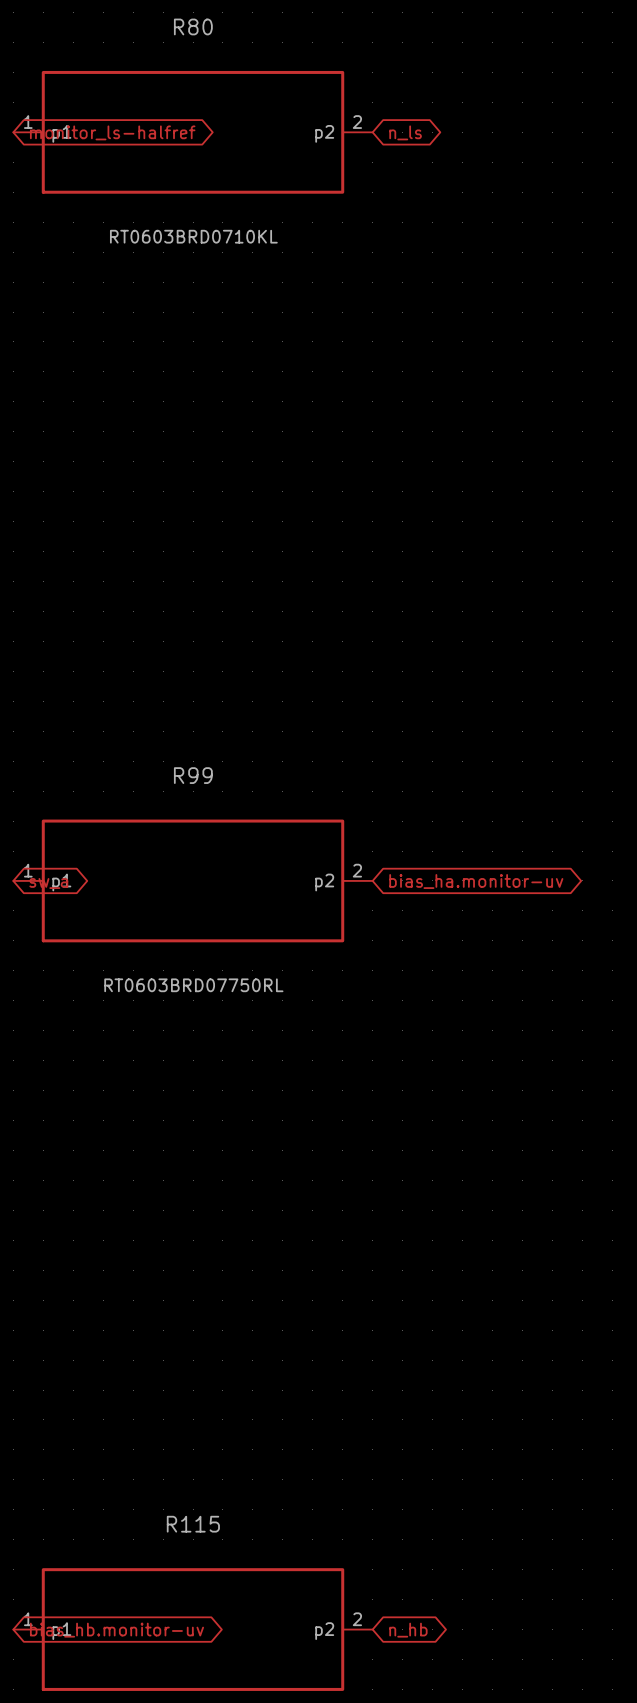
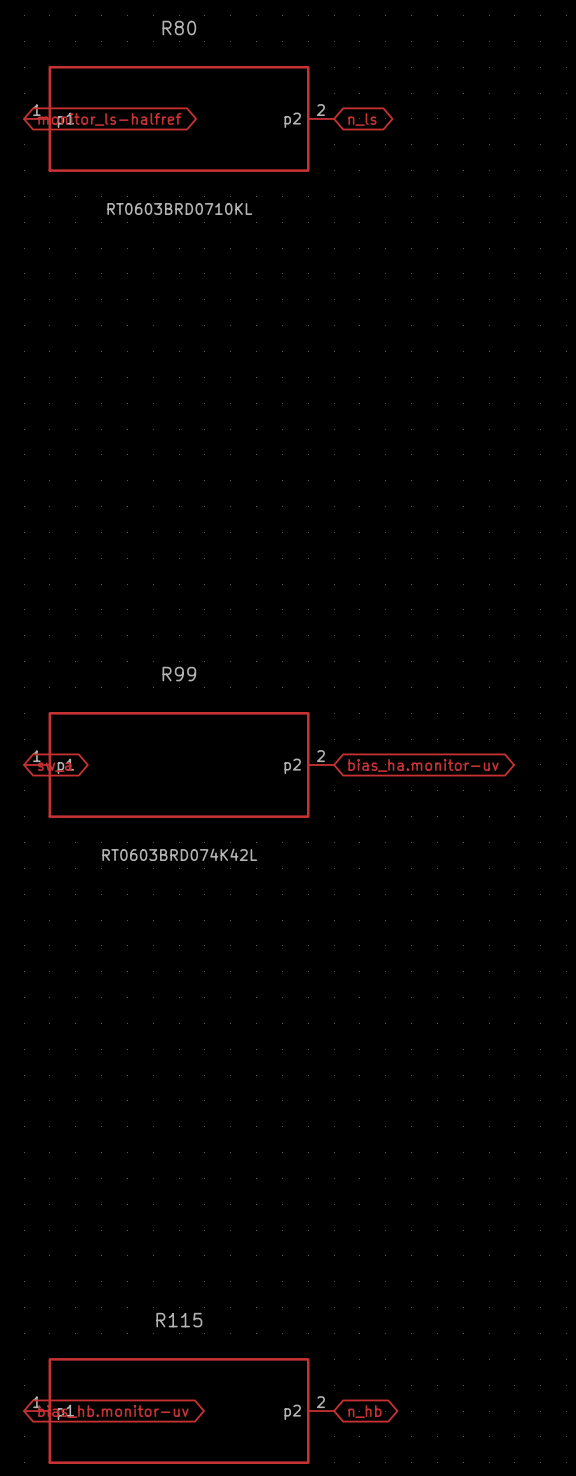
R99 value: RT0603BRD07750RL (193, 985) -> RT0603BRD074K42L (179, 854)

